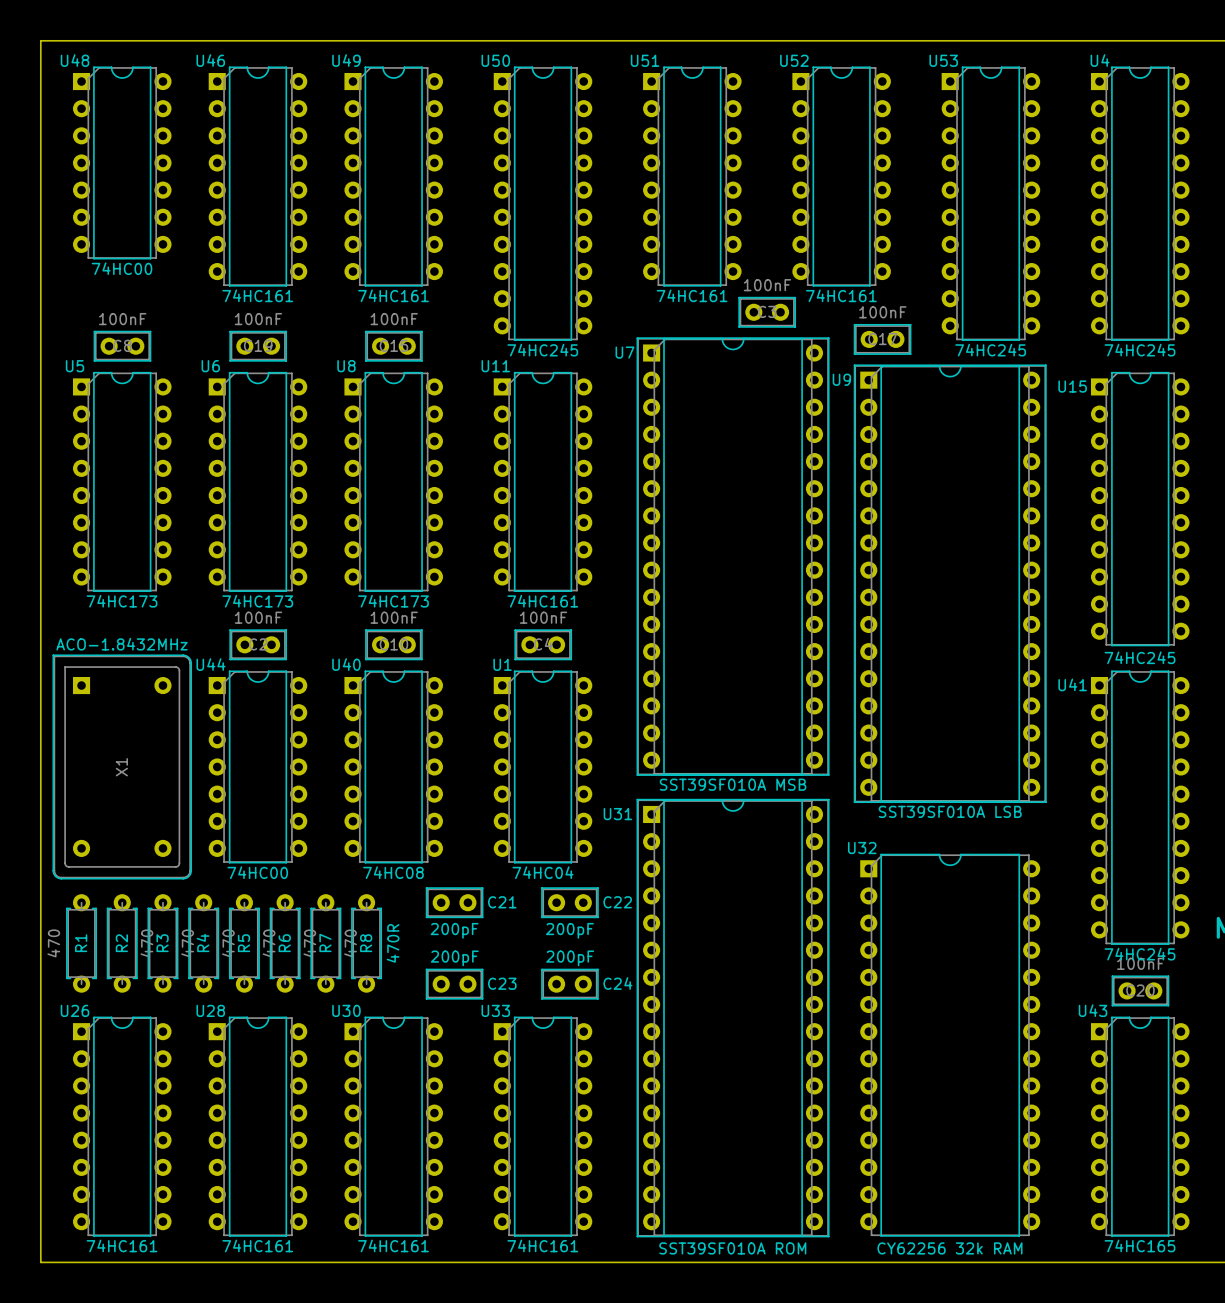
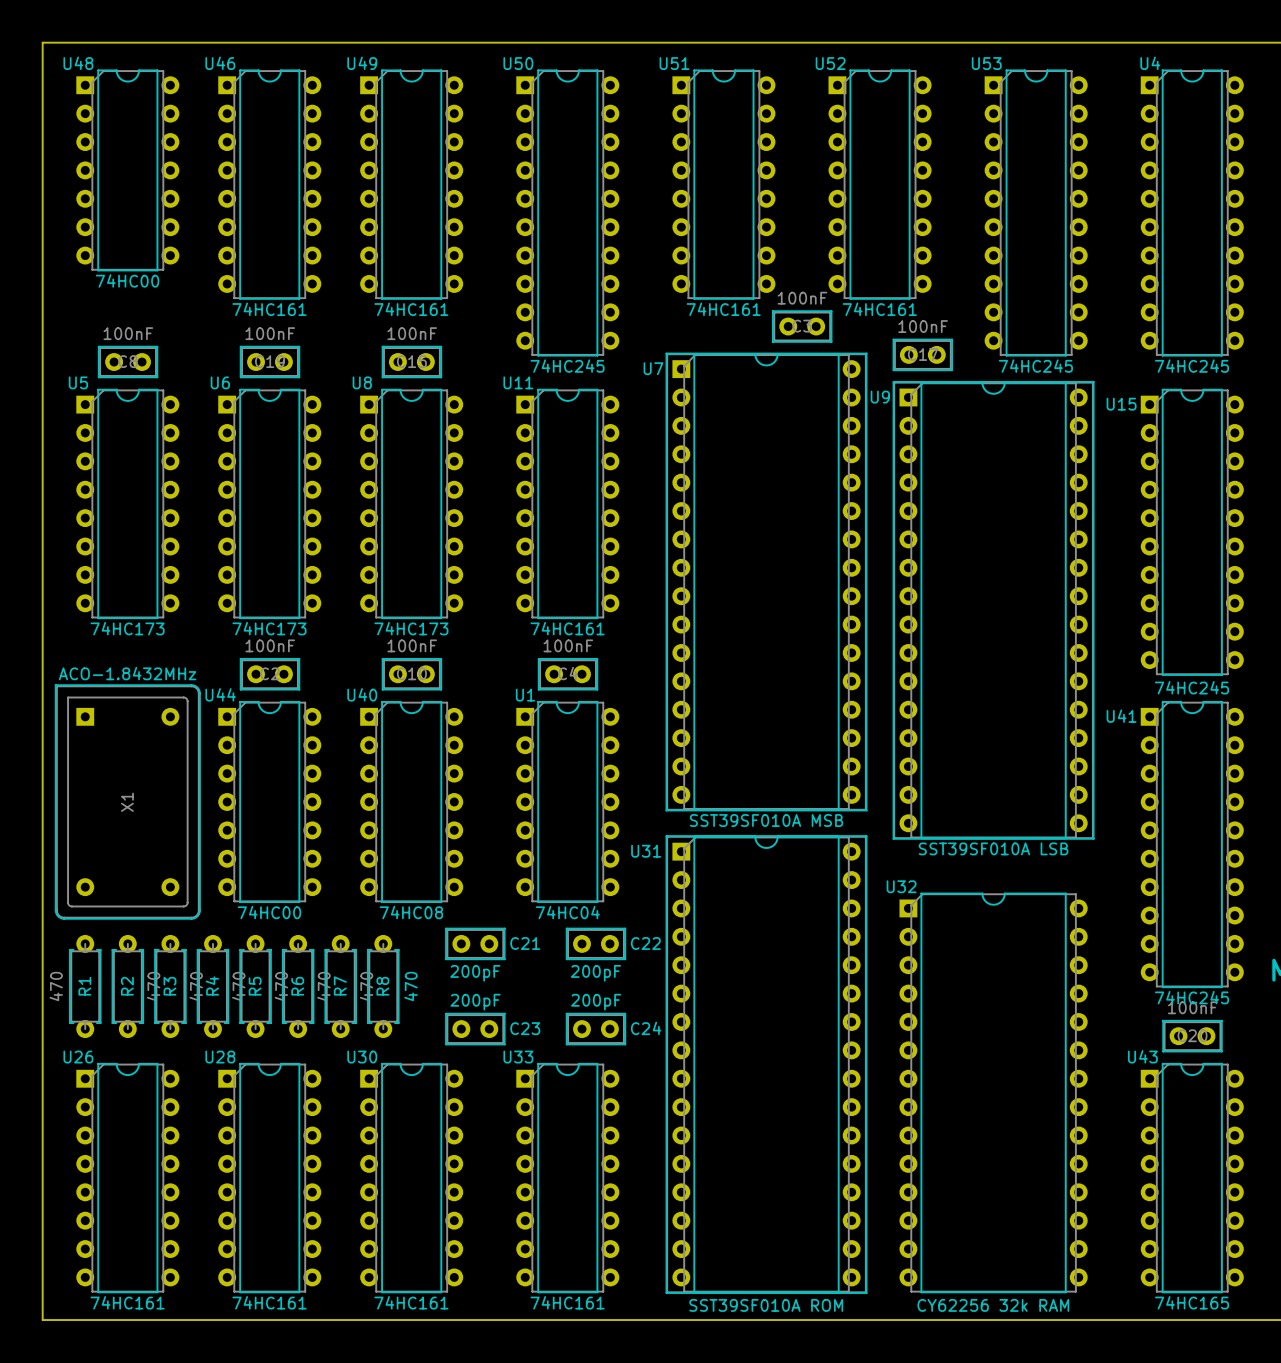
R8 value: 470R (393, 943) -> 470 (411, 986)

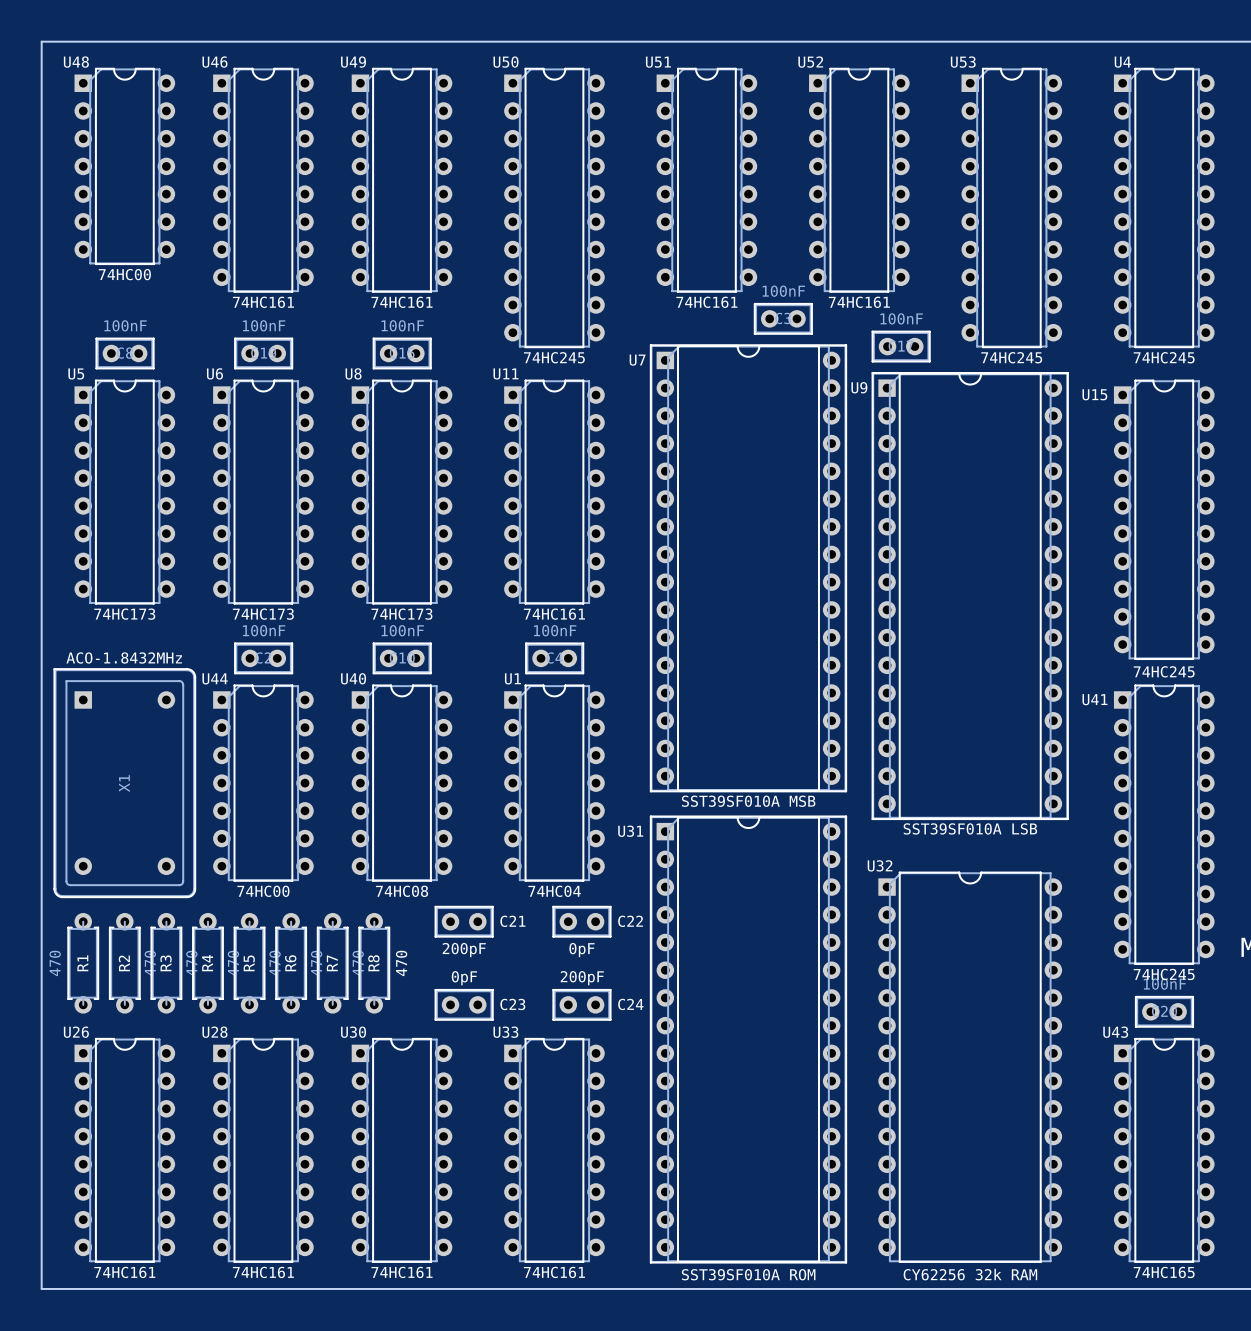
C22 value: 200pF (595, 973) -> 0pF (582, 950)
C23 value: 200pF (475, 1002) -> 0pF (464, 978)

